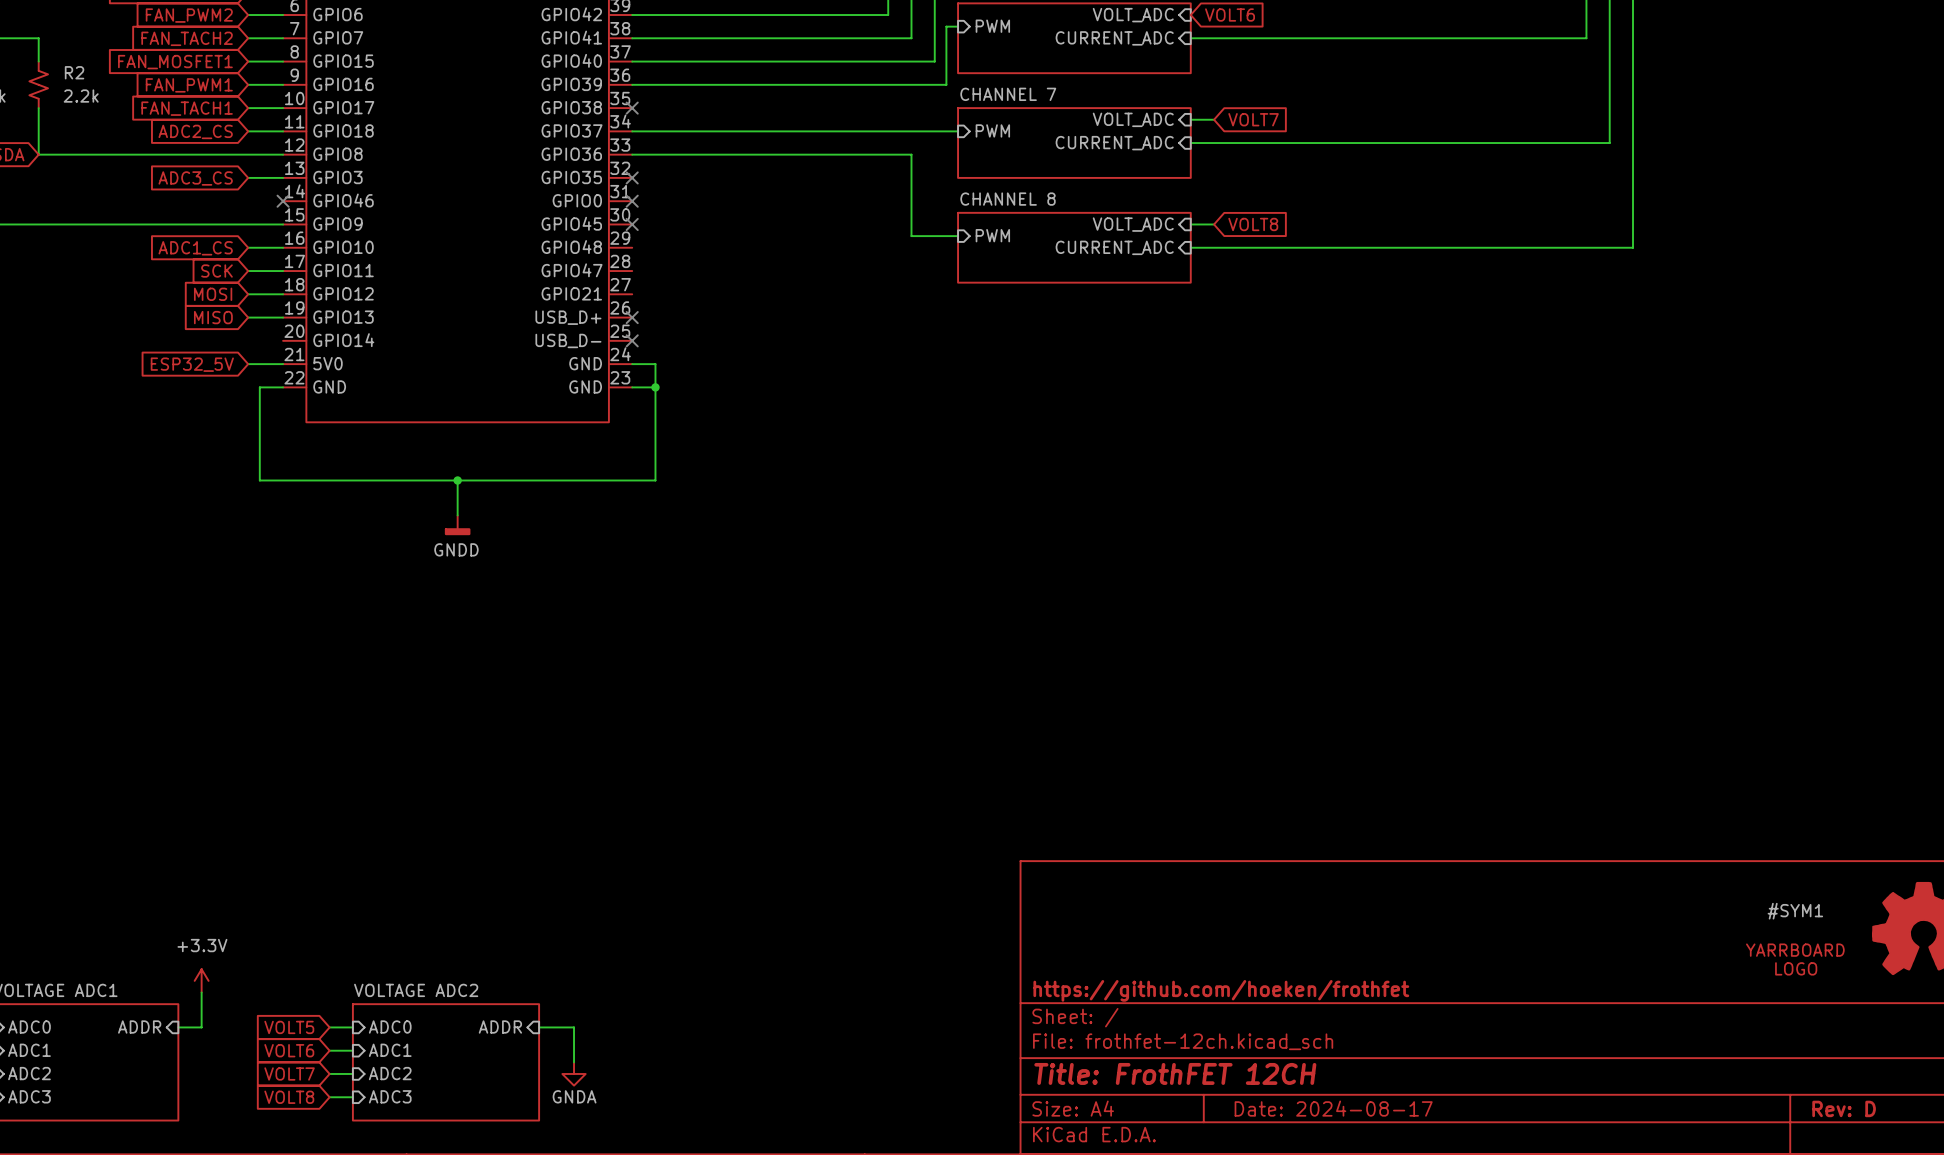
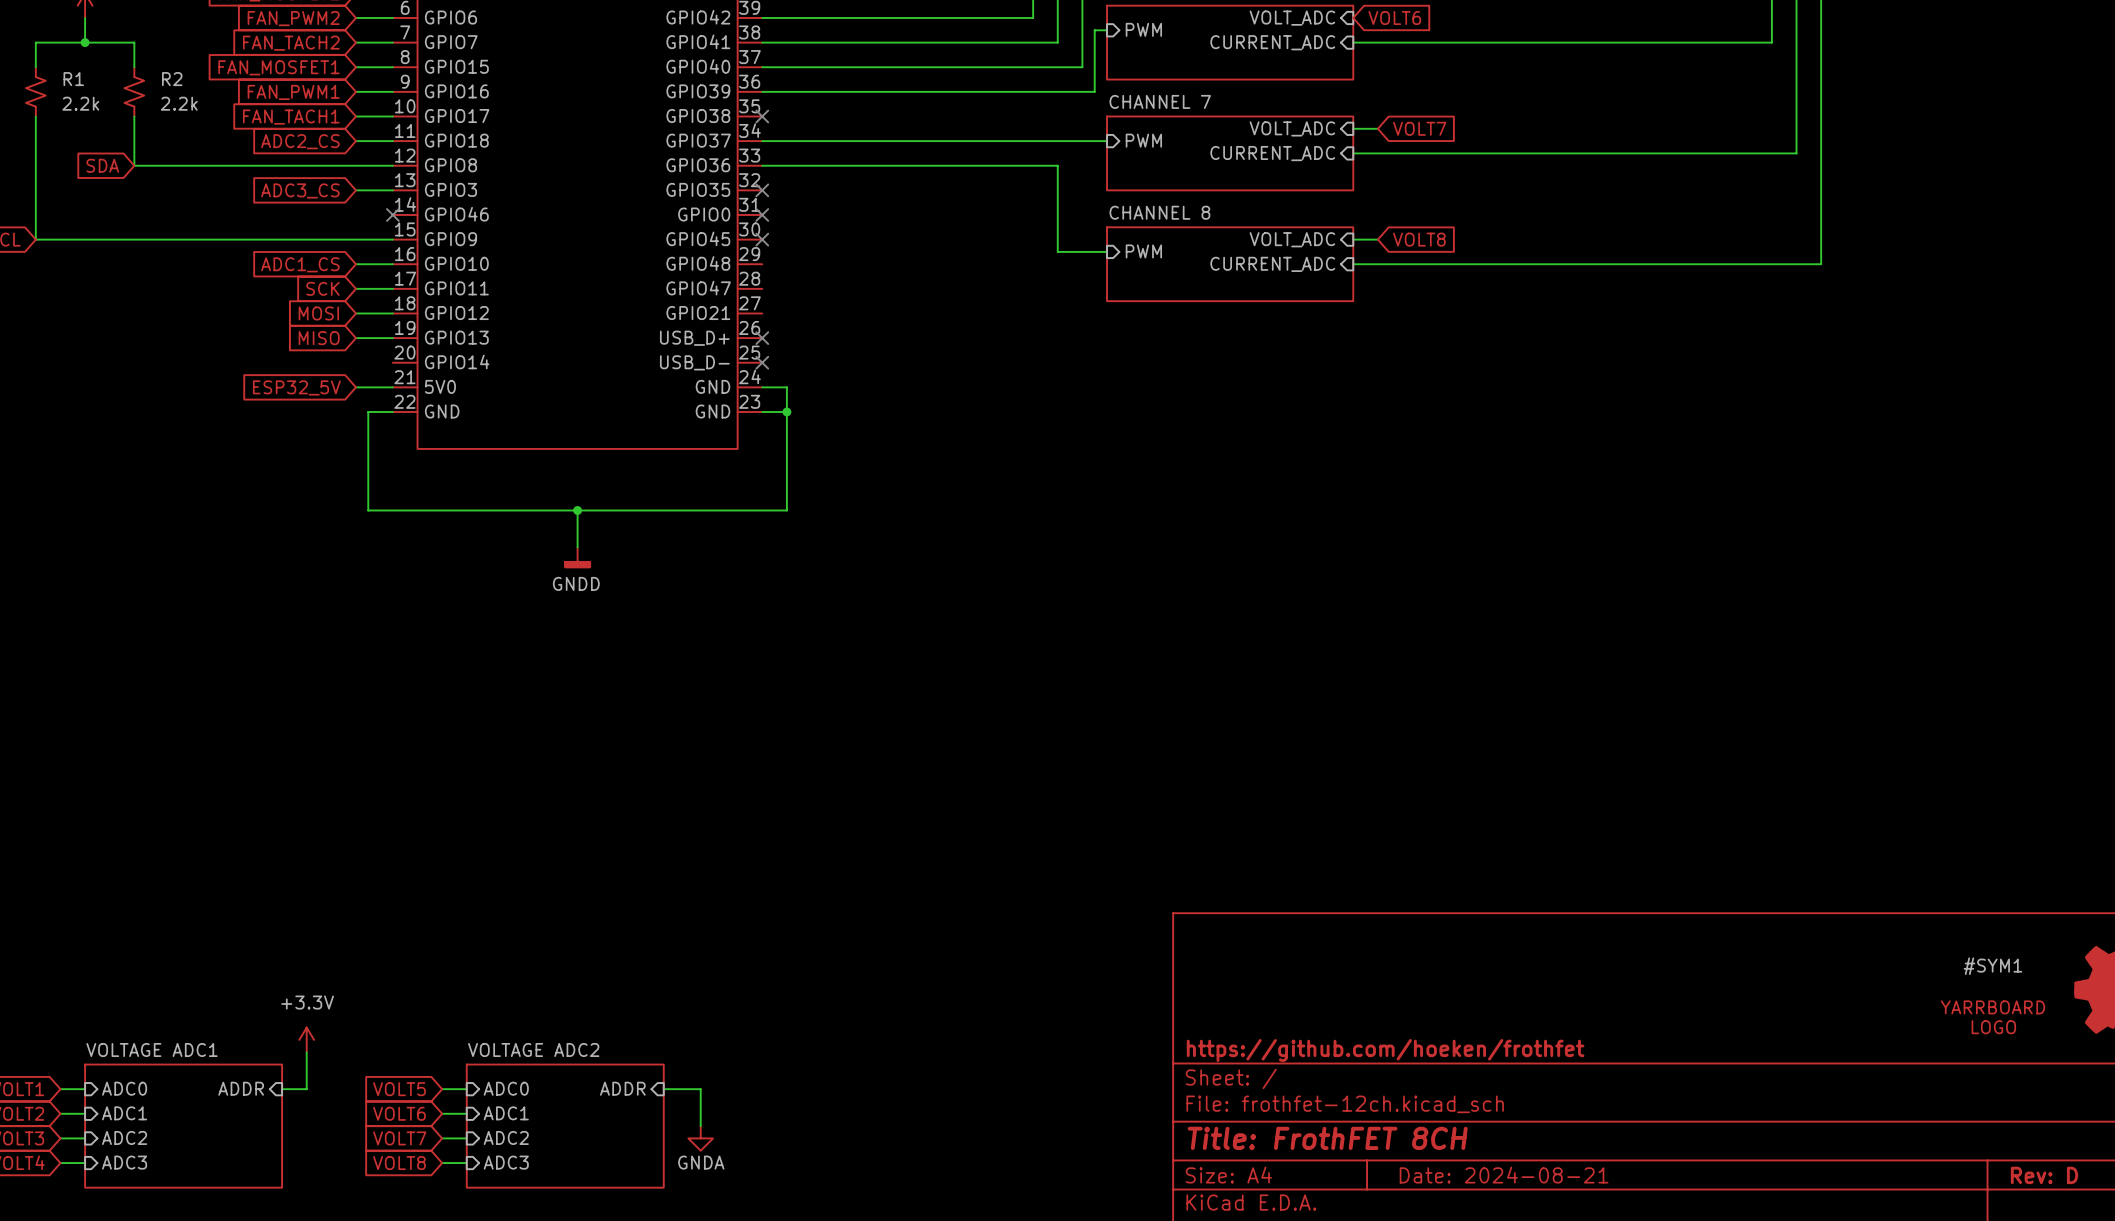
title block: Title: FrothFET 12CH (1175, 1073) -> Title: FrothFET 8CH (1327, 1138)
title block: Date: 2024-08-17 (1333, 1108) -> Date: 2024-08-21 (1504, 1175)

